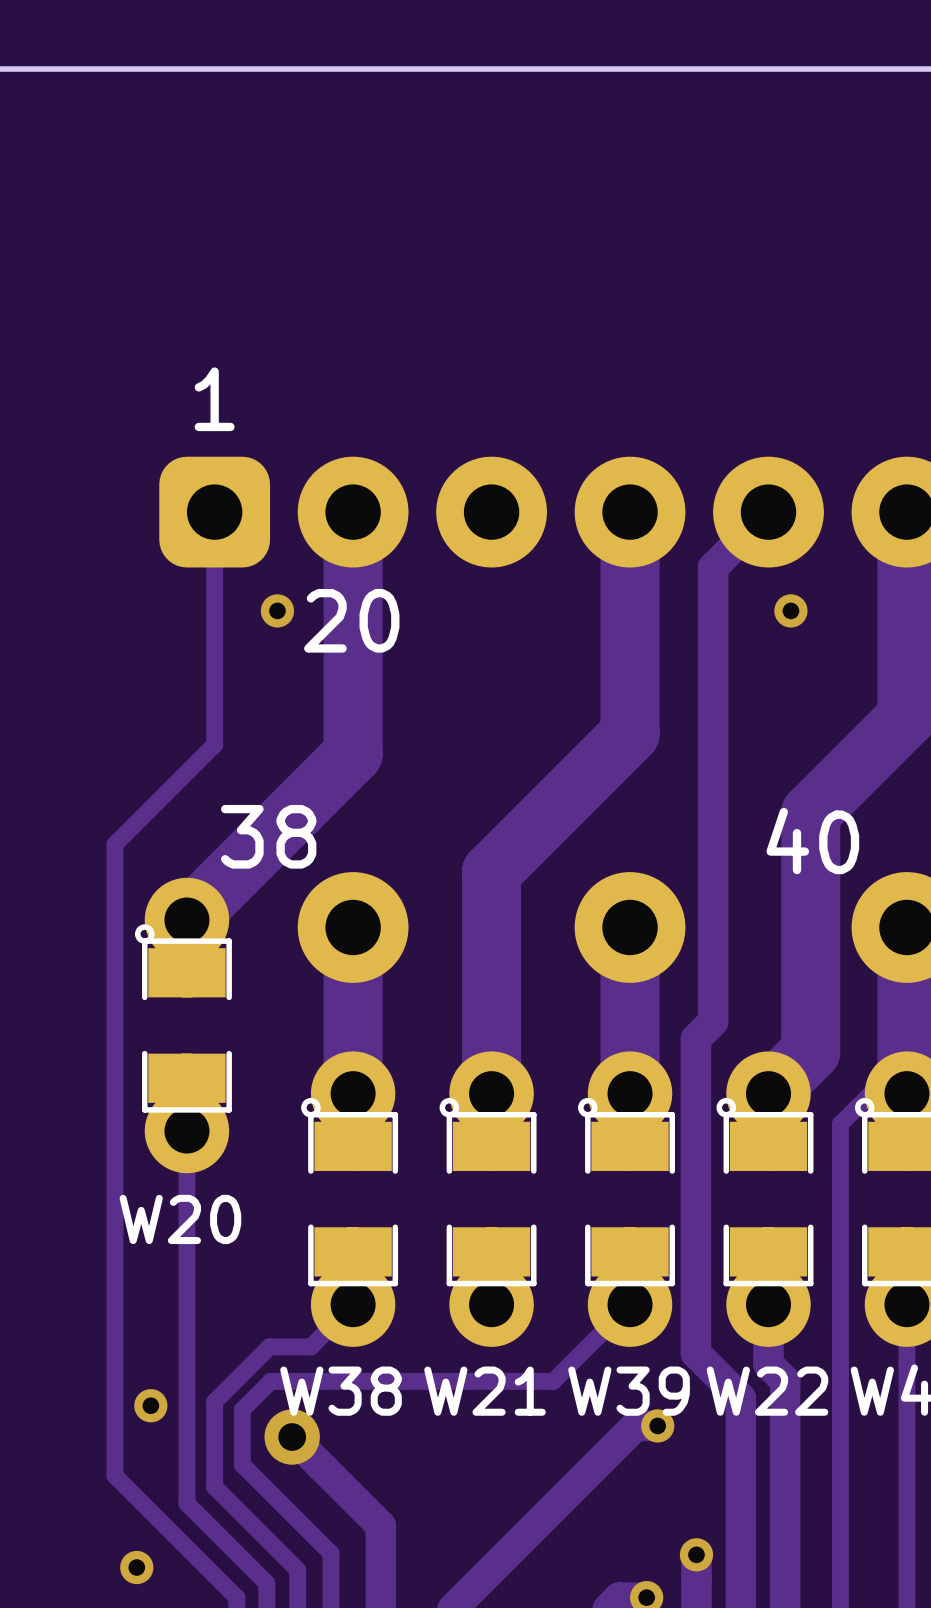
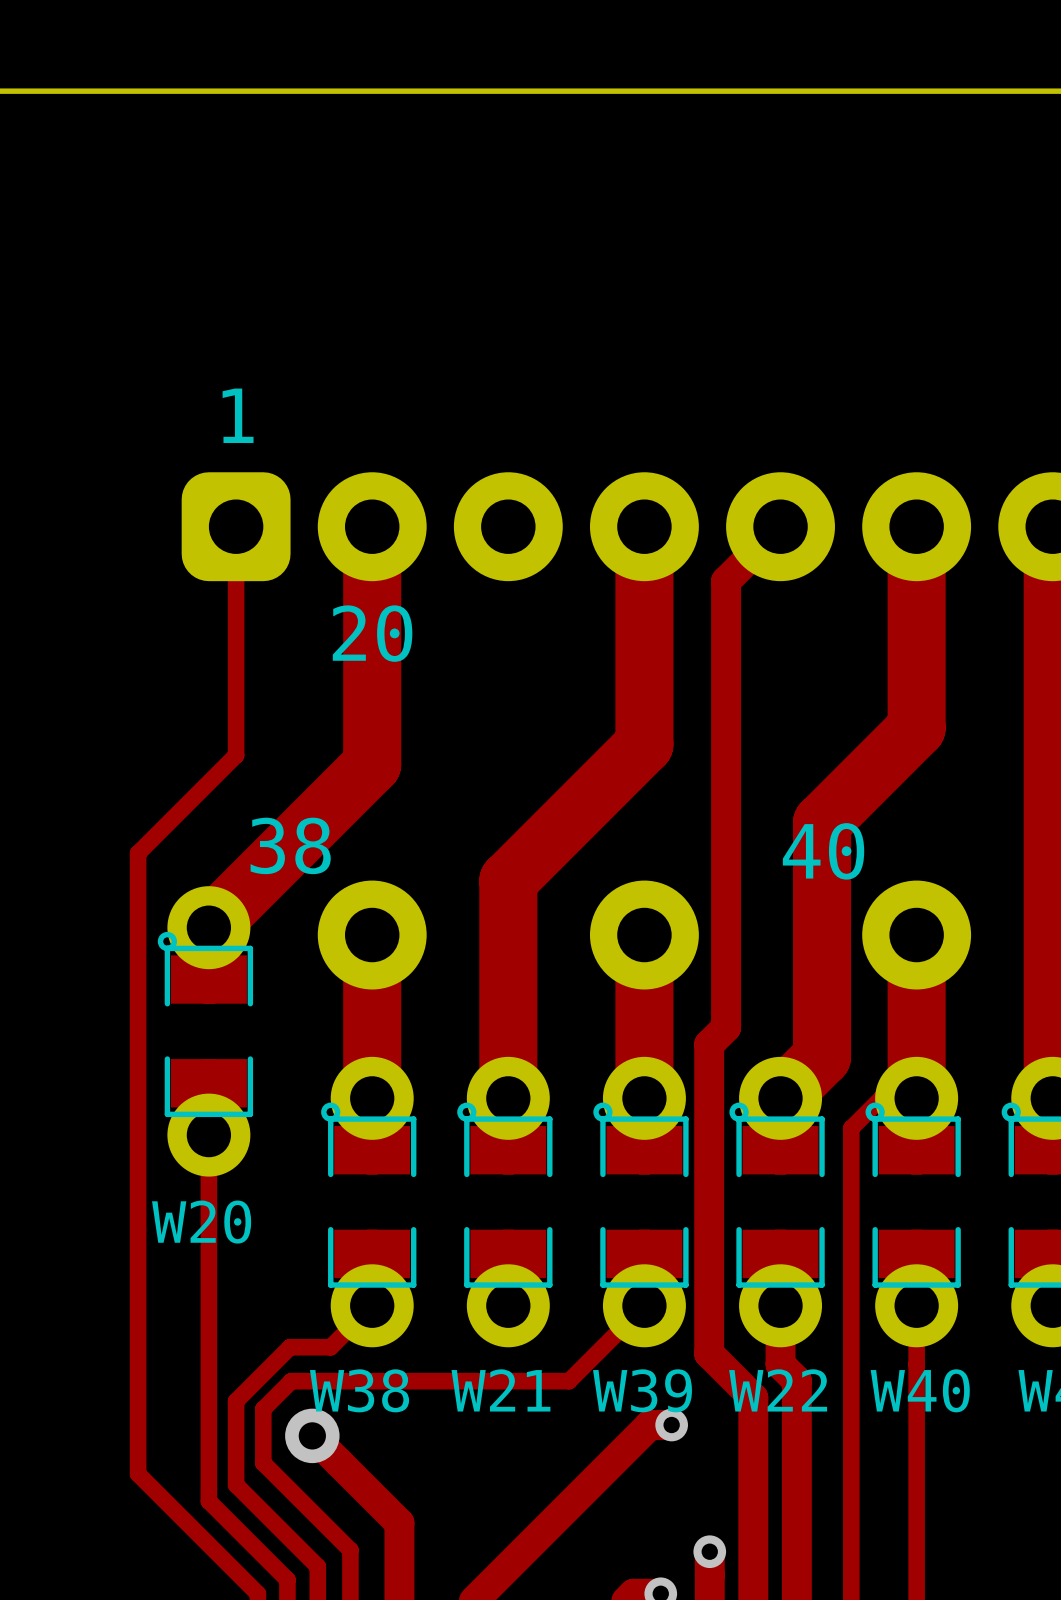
via: (277, 610) -> none
via: (790, 610) -> none
via: (150, 1405) -> none
via: (136, 1567) -> none

